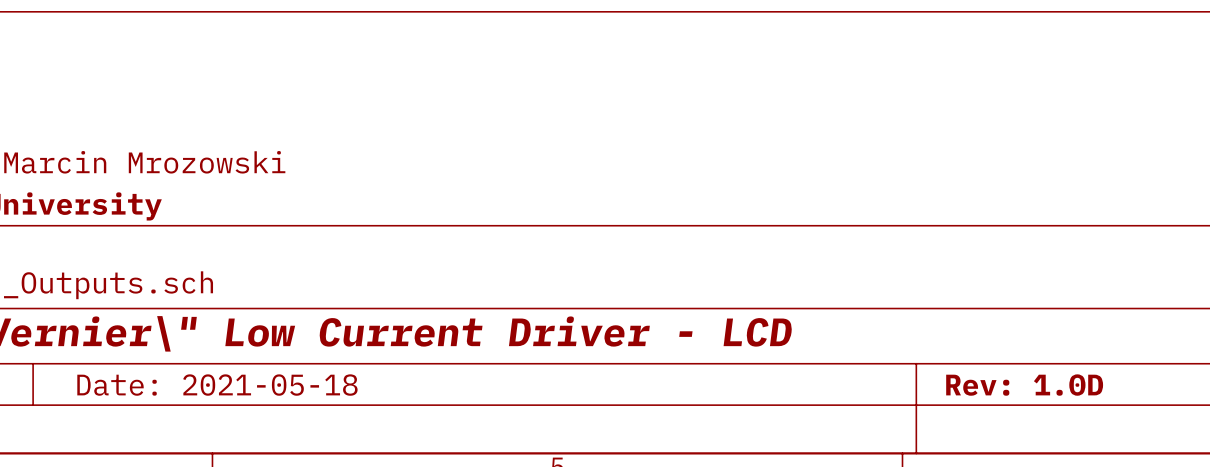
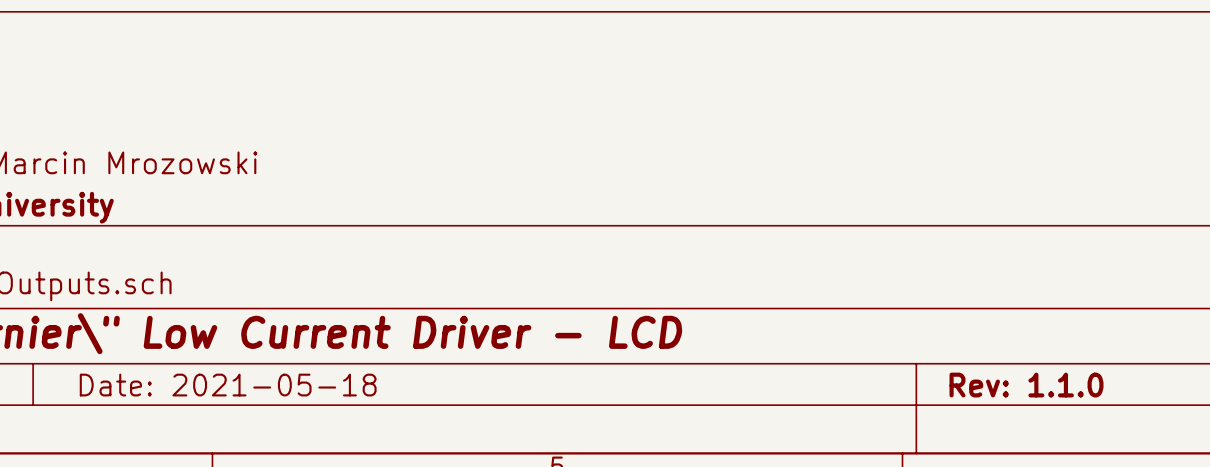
title block: Rev: 1.0D (1024, 385) -> Rev: 1.1.0 (1026, 385)

